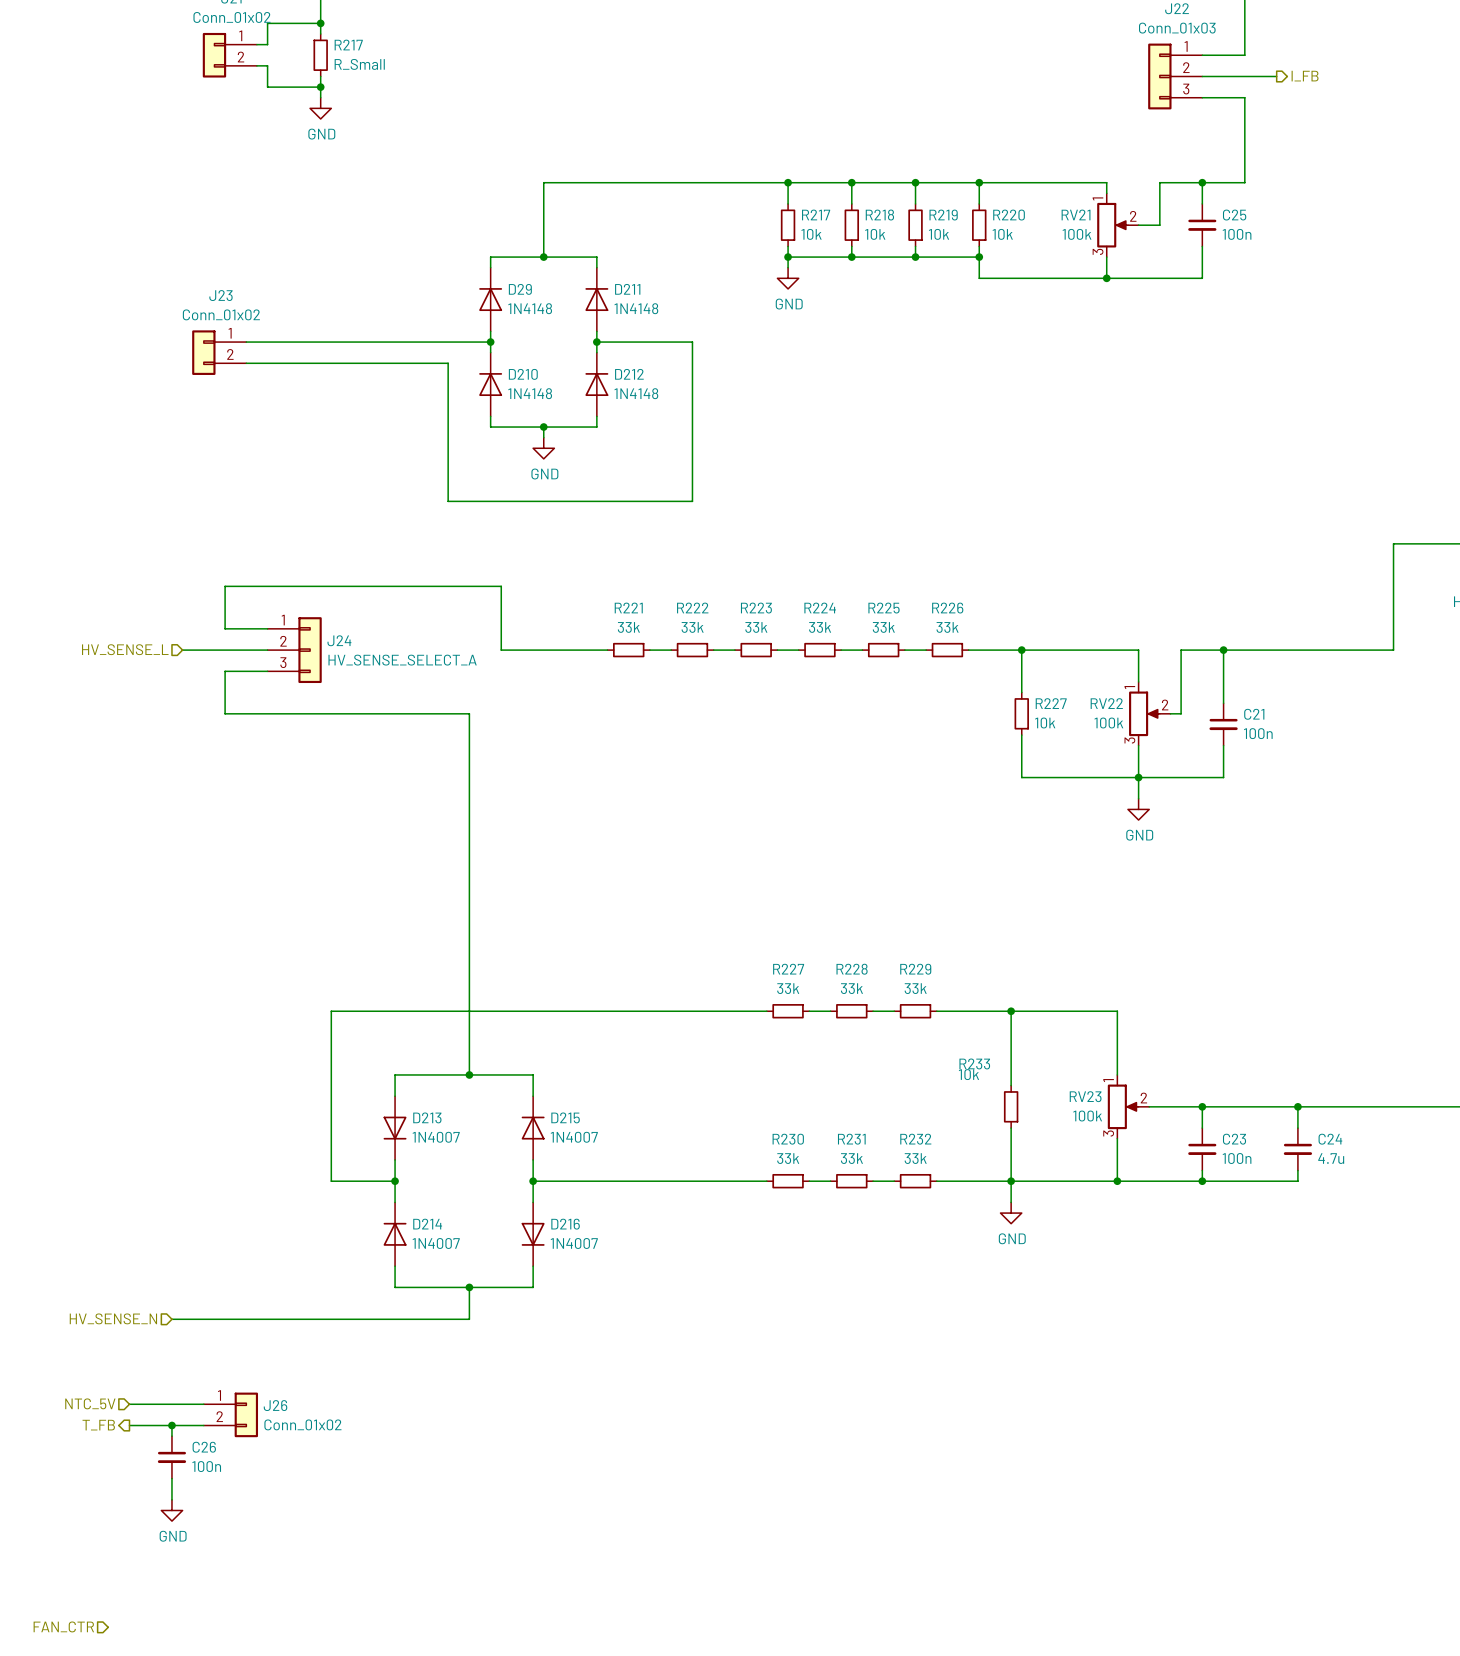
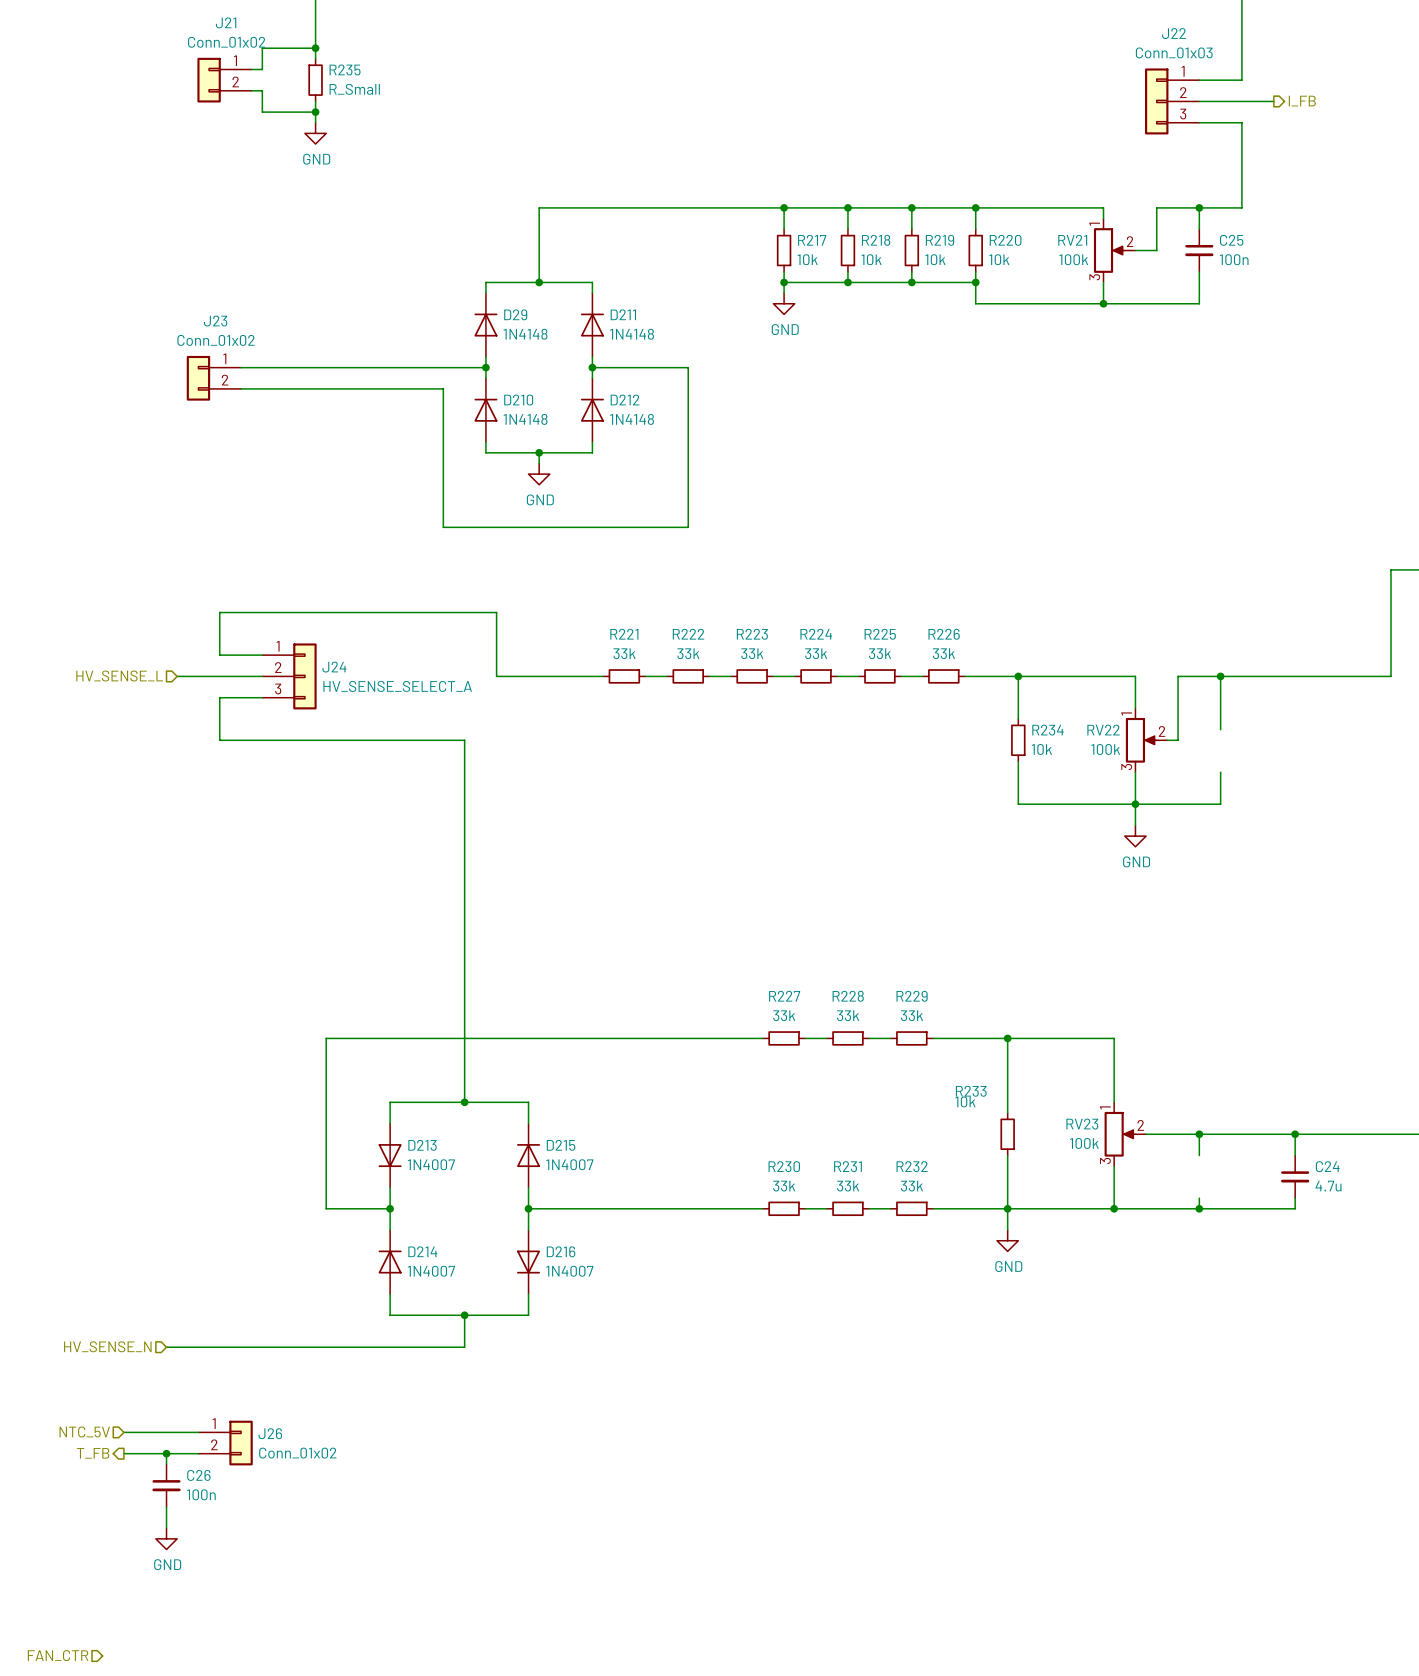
R217 name: R217 (348, 45) -> R235 (345, 69)
R227 name: R227 (1051, 703) -> R234 (1047, 730)
C21: 100n (1223, 724) -> none
C23: 100n (1202, 1149) -> none

